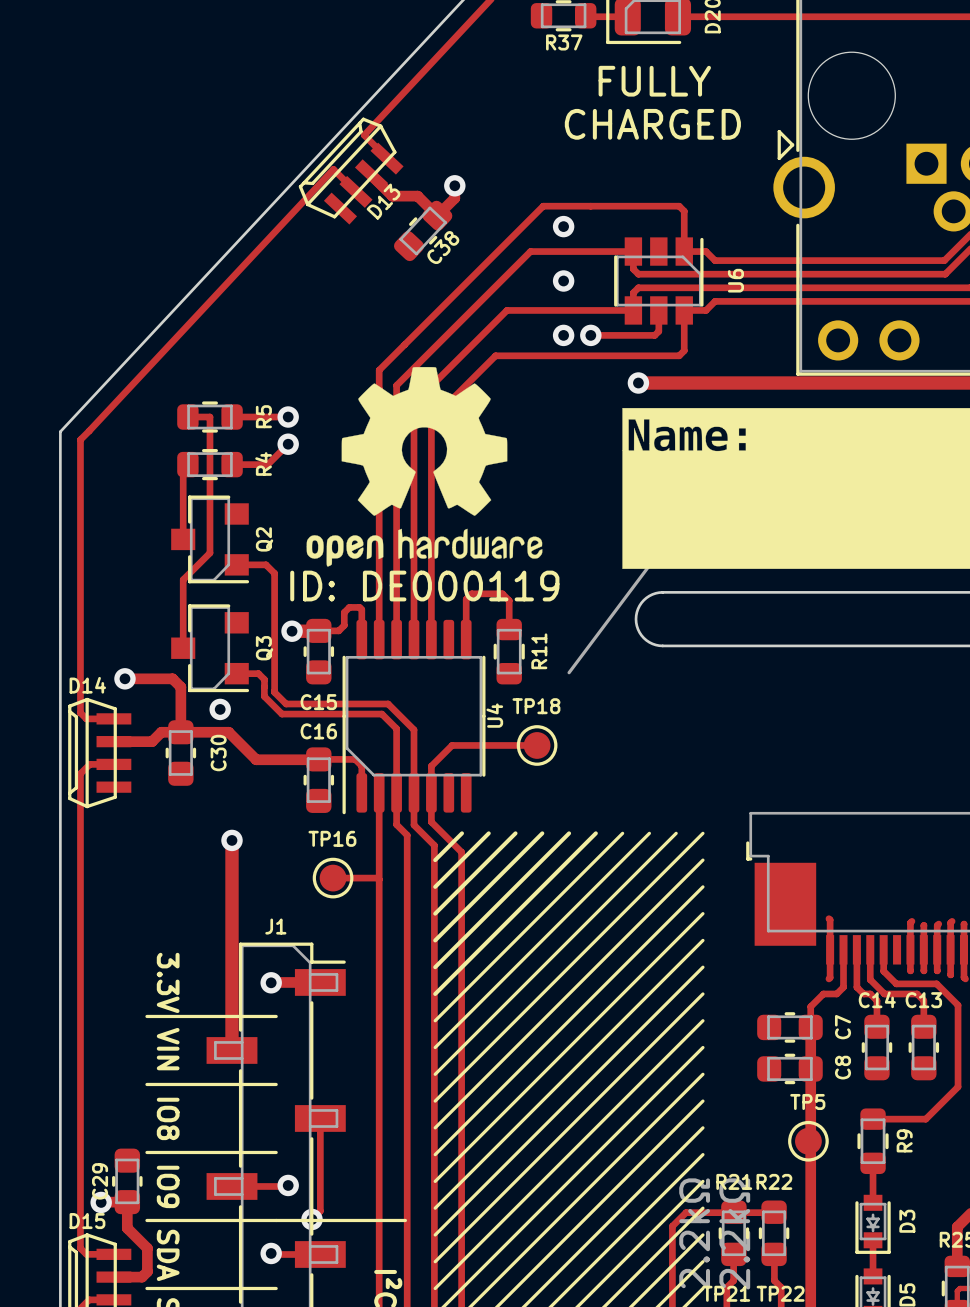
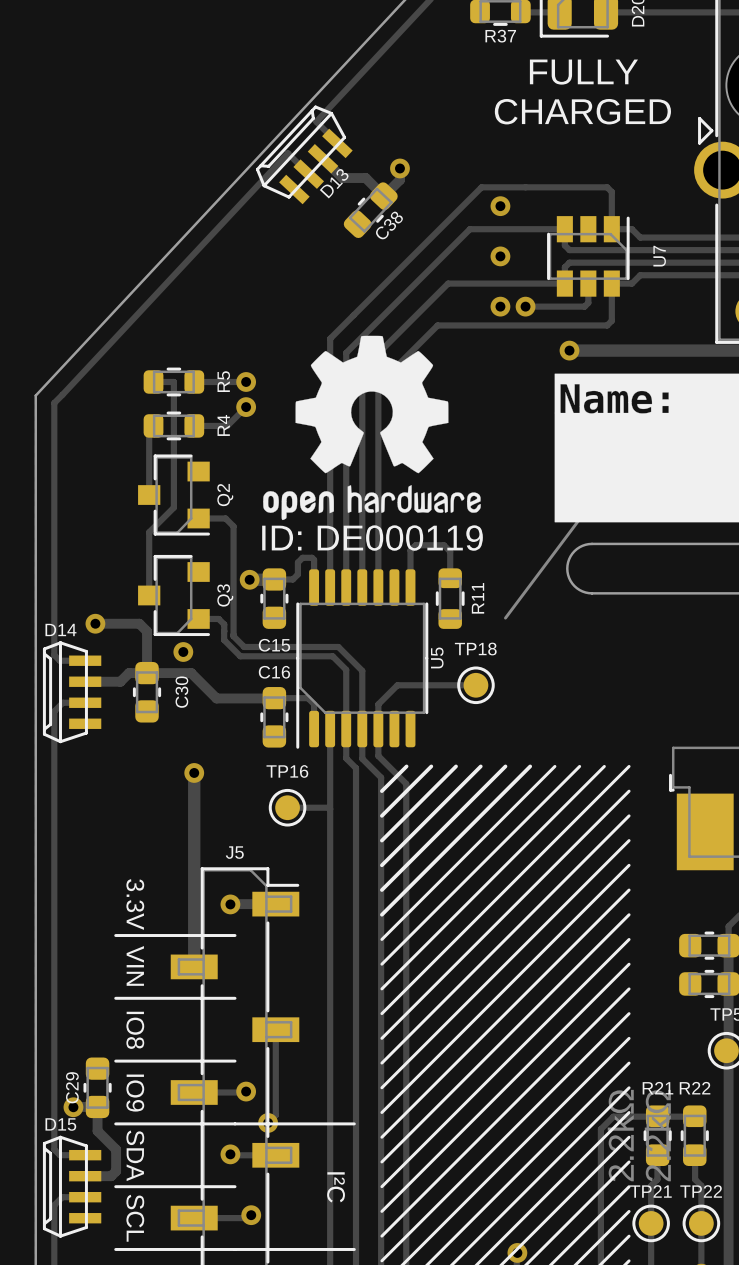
U6 name: U6 (735, 280) -> U7 (659, 256)
U4 name: U4 (494, 715) -> U5 (437, 657)
J1 name: J1 (275, 926) -> J5 (234, 852)

